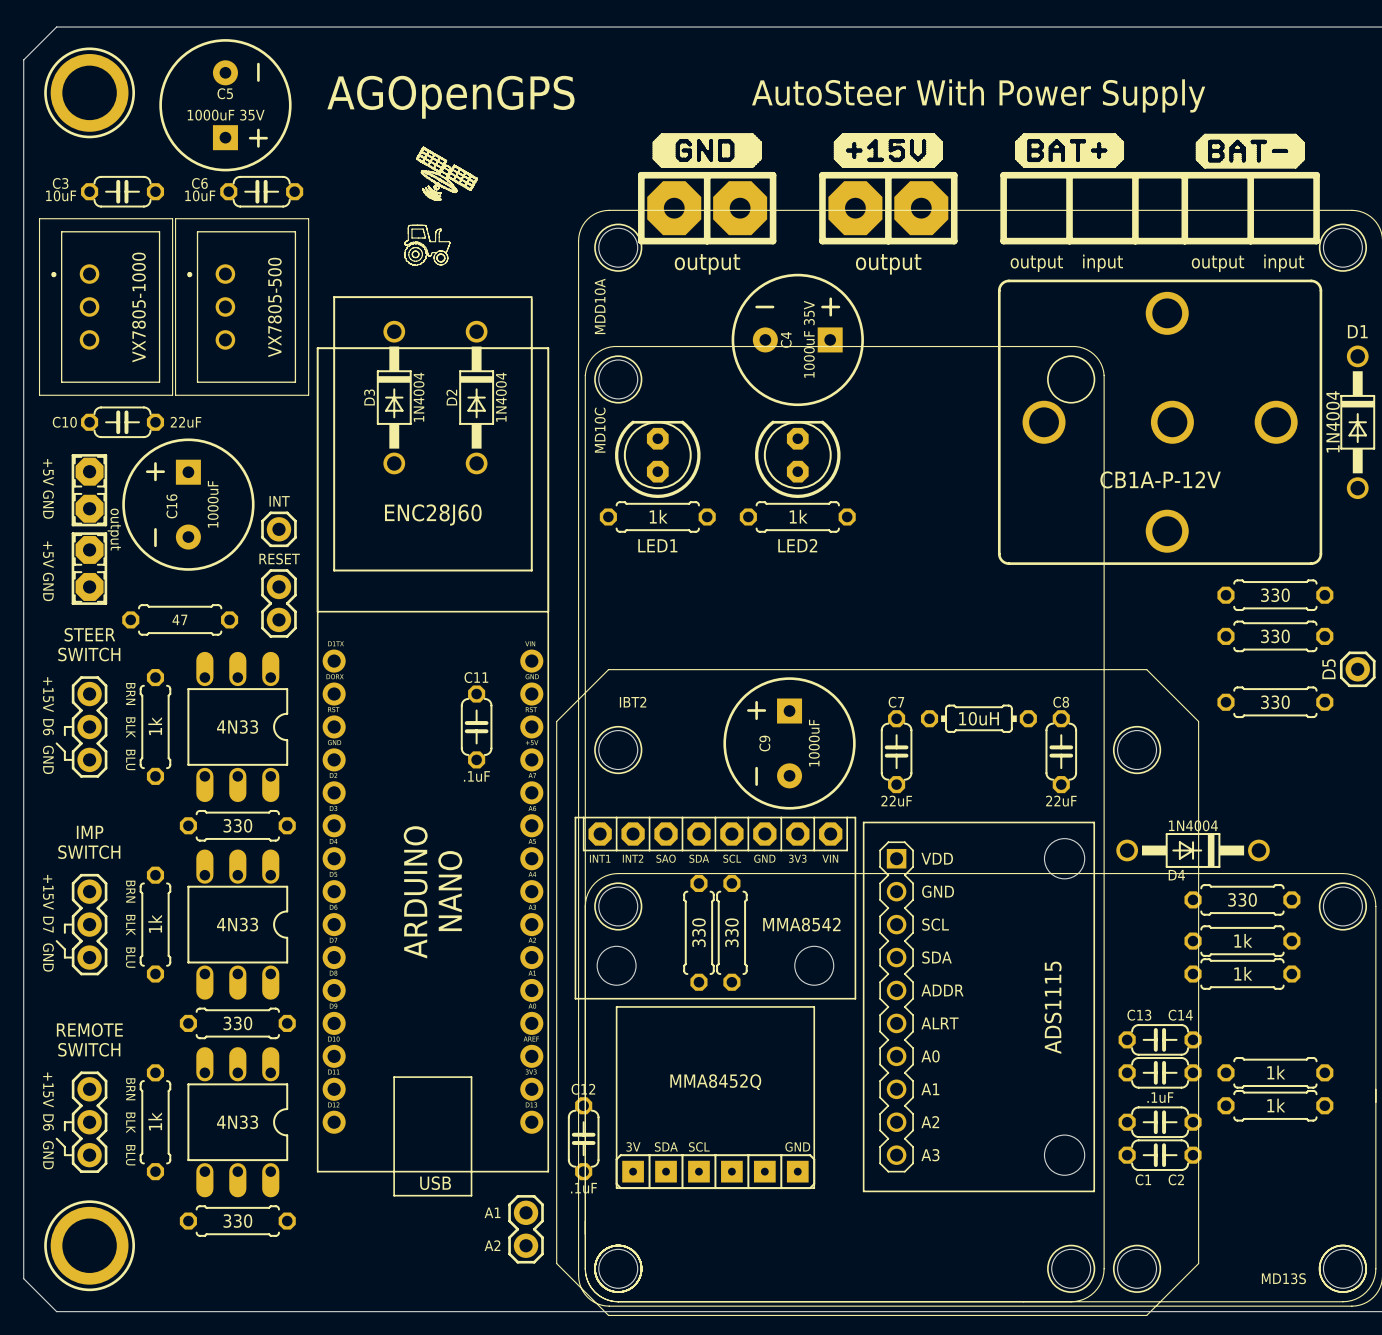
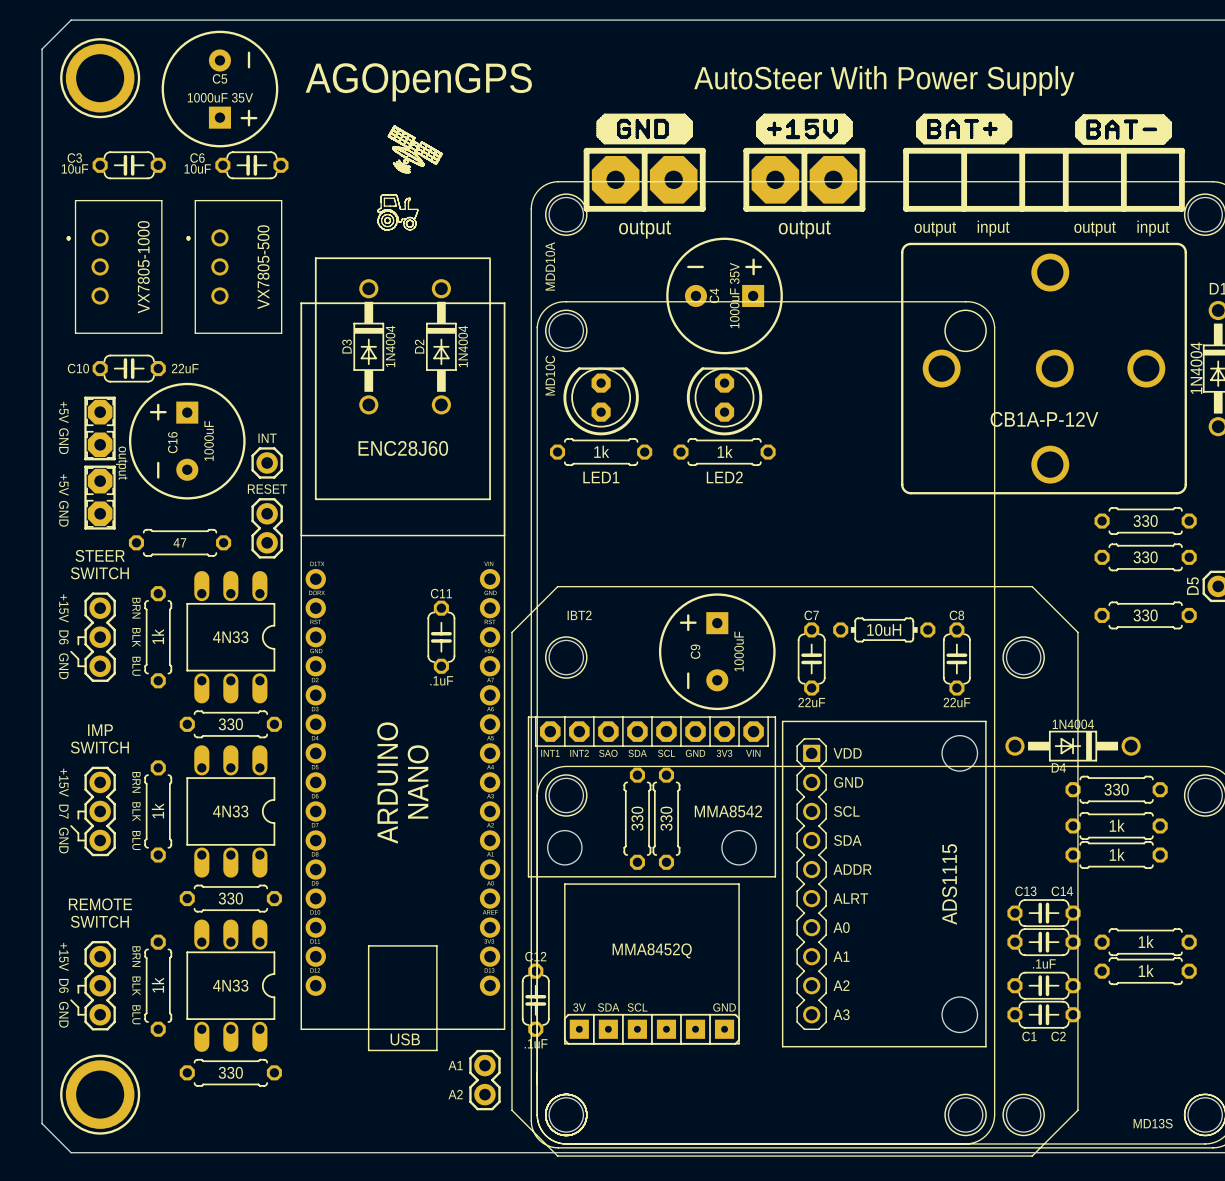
line: (39, 218) (172, 218) (172, 395) (39, 395) (39, 218) -> none
line: (175, 218) (308, 218) (308, 395) (175, 395) (175, 218) -> none

